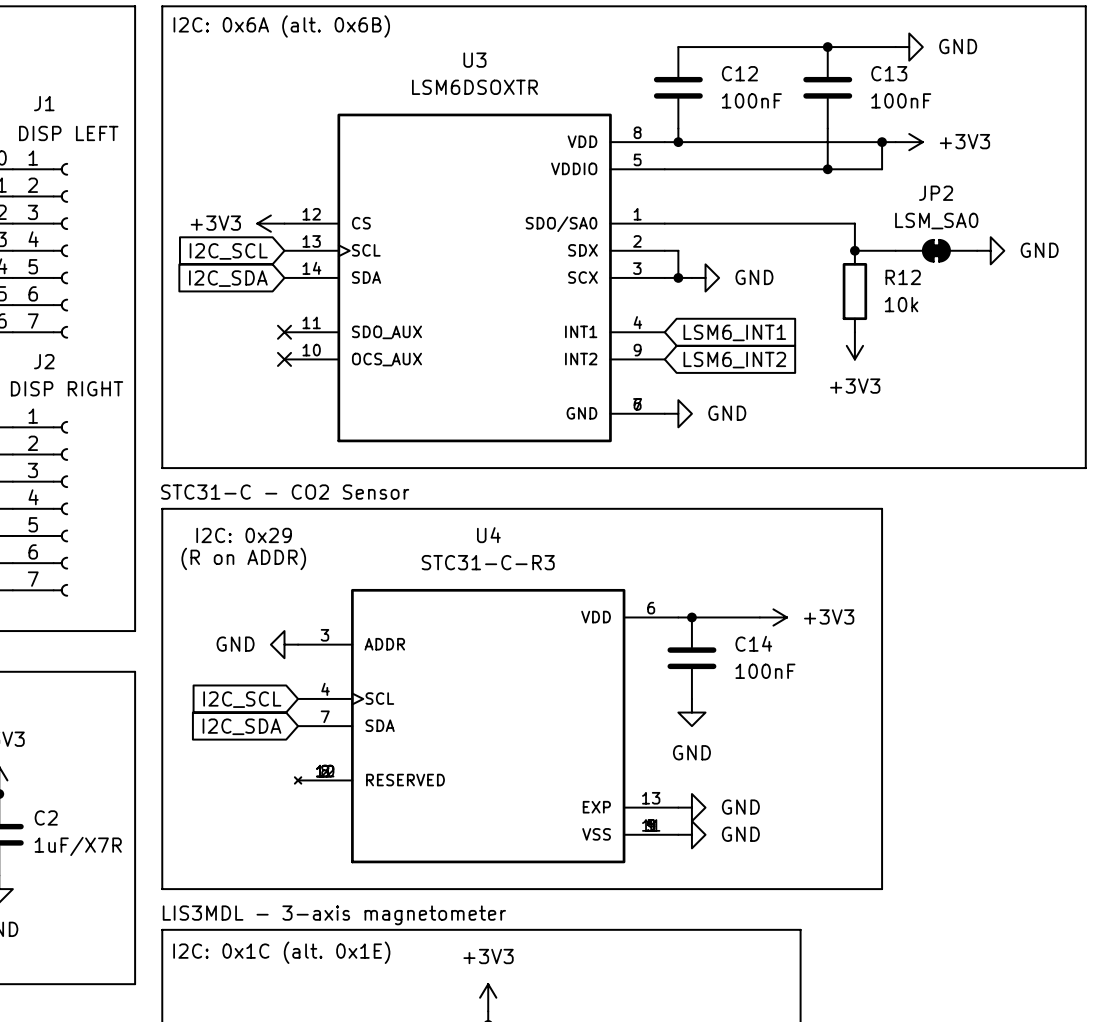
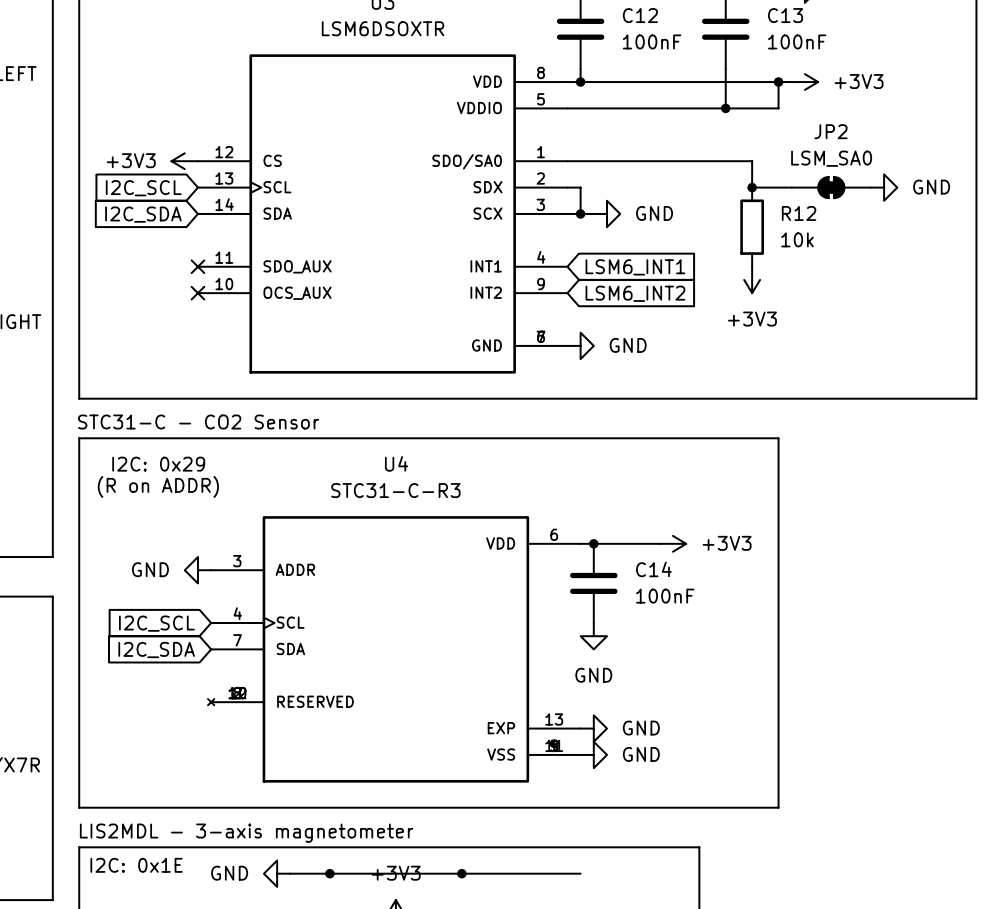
text: LIS3MDL - 3-axis magnetometer (334, 915) -> LIS2MDL - 3-axis magnetometer (246, 833)
text: none -> I2C: 0x1E (136, 865)
text: I2C: 0x1C (alt. 0x1E) (281, 952) -> none
power symbol: none -> GND (277, 873)
wire: none -> (290, 873) (580, 873)
junction: none -> (329, 873)
junction: none -> (461, 873)

